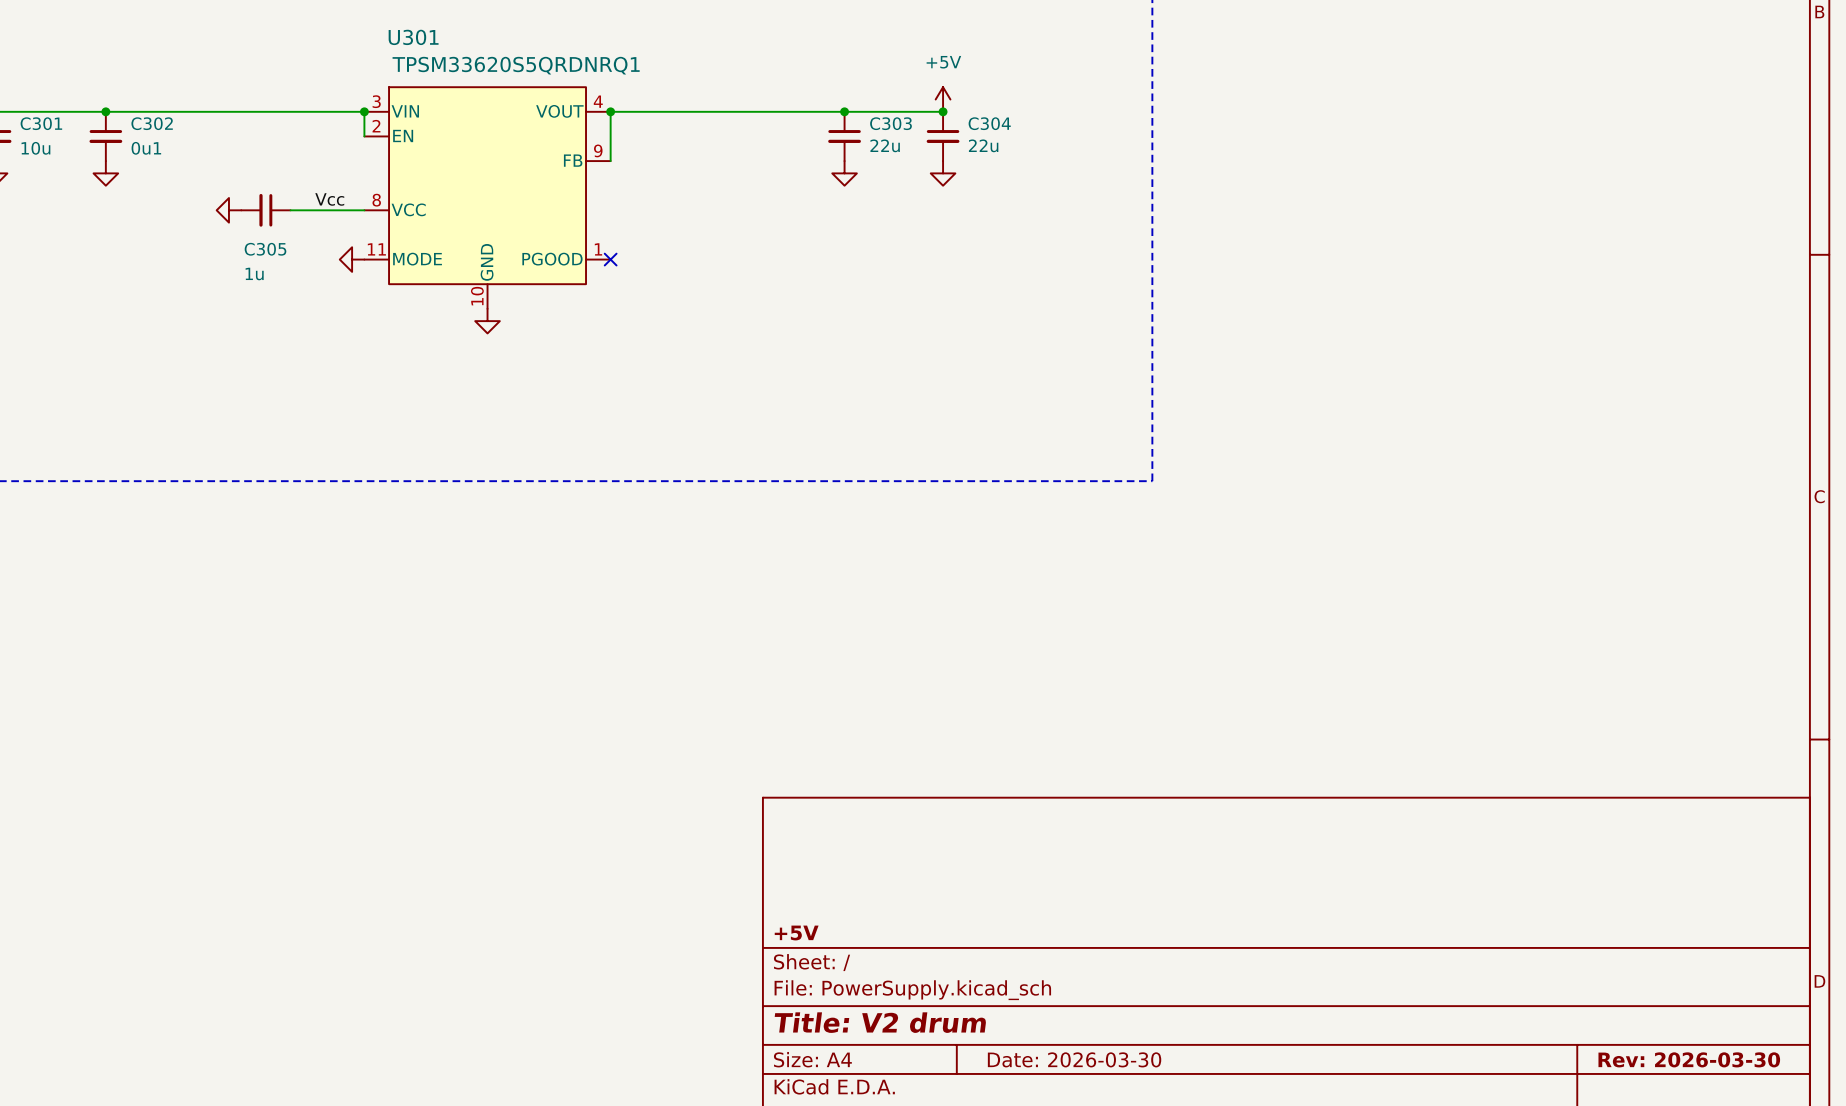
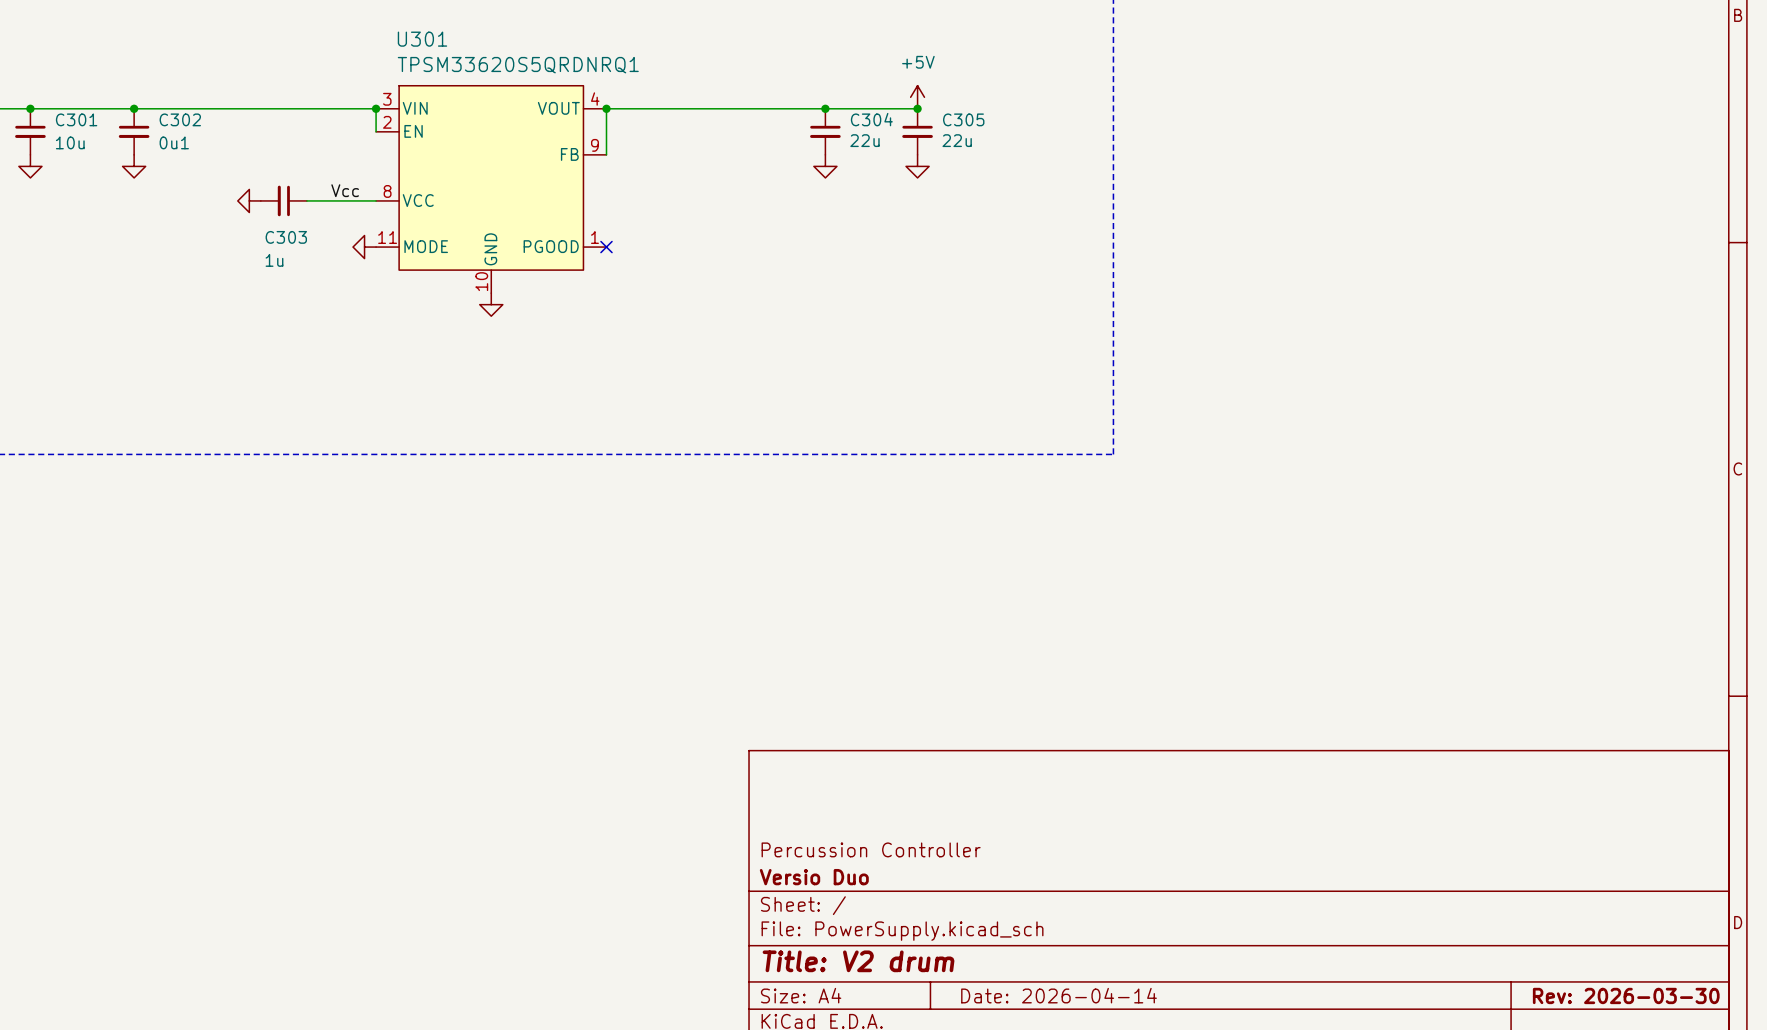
C303 name: C303 (891, 123) -> C304 (871, 119)
C304 name: C304 (989, 123) -> C305 (963, 119)
C305 name: C305 (265, 249) -> C303 (286, 237)
title block: none -> Percussion Controller (871, 849)
title block: +5V (796, 933) -> Versio Duo (814, 877)
title block: Date: 2026-03-30 (1074, 1059) -> Date: 2026-04-14 (1059, 995)

